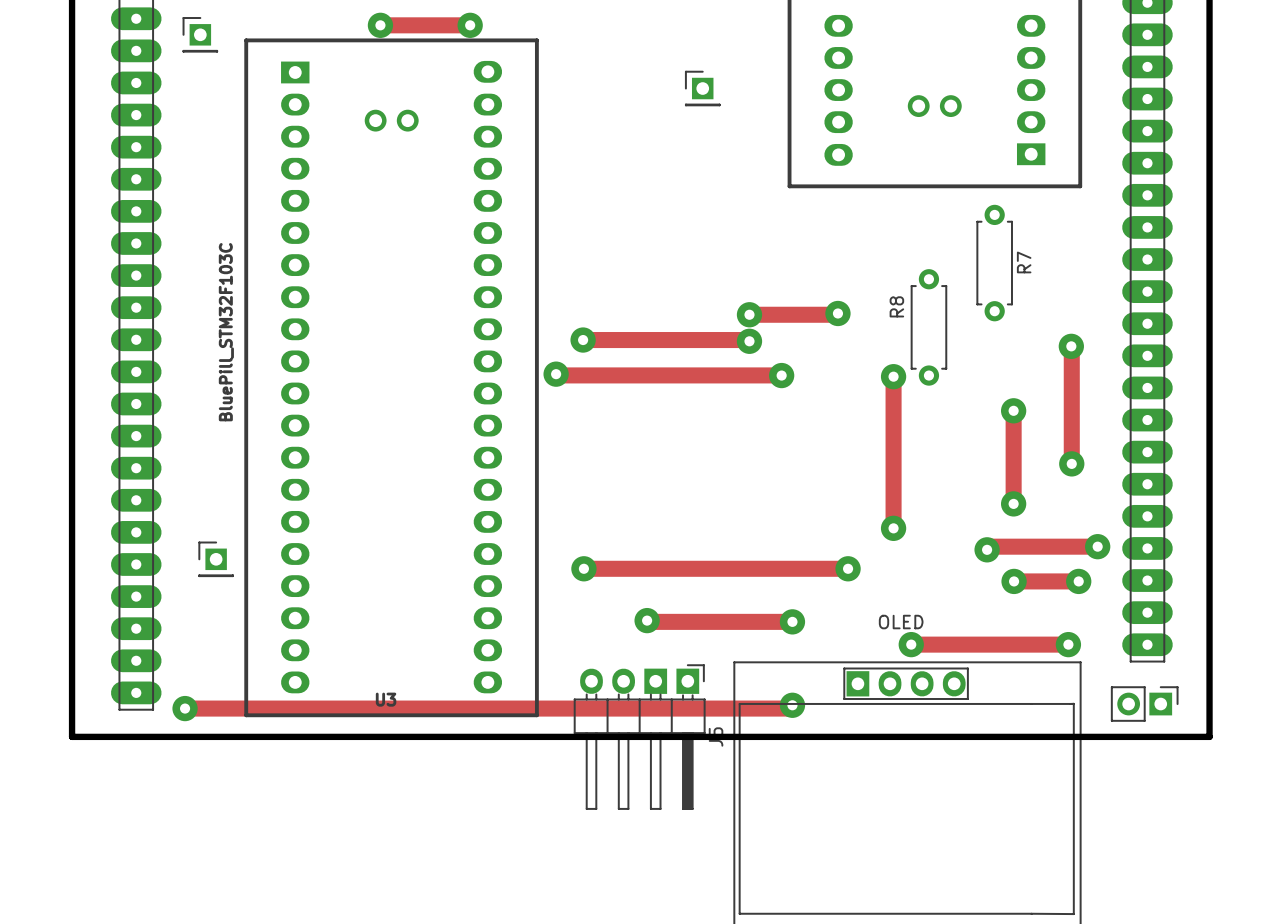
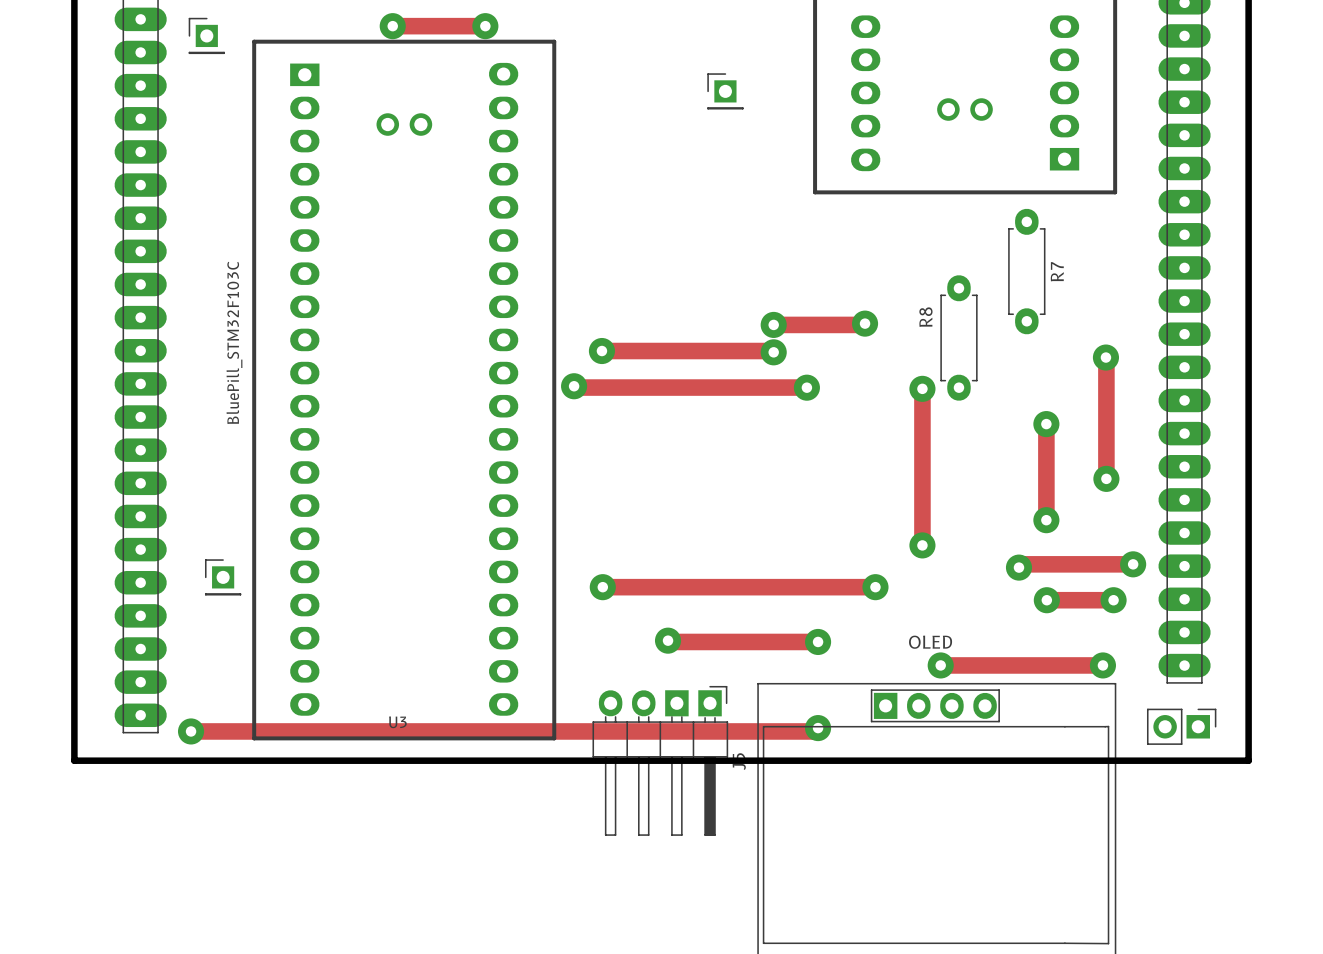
R7 footprint: [976, 204, 1013, 322] -> [1008, 208, 1046, 335]
R8 footprint: [910, 269, 948, 386] -> [940, 275, 978, 401]

